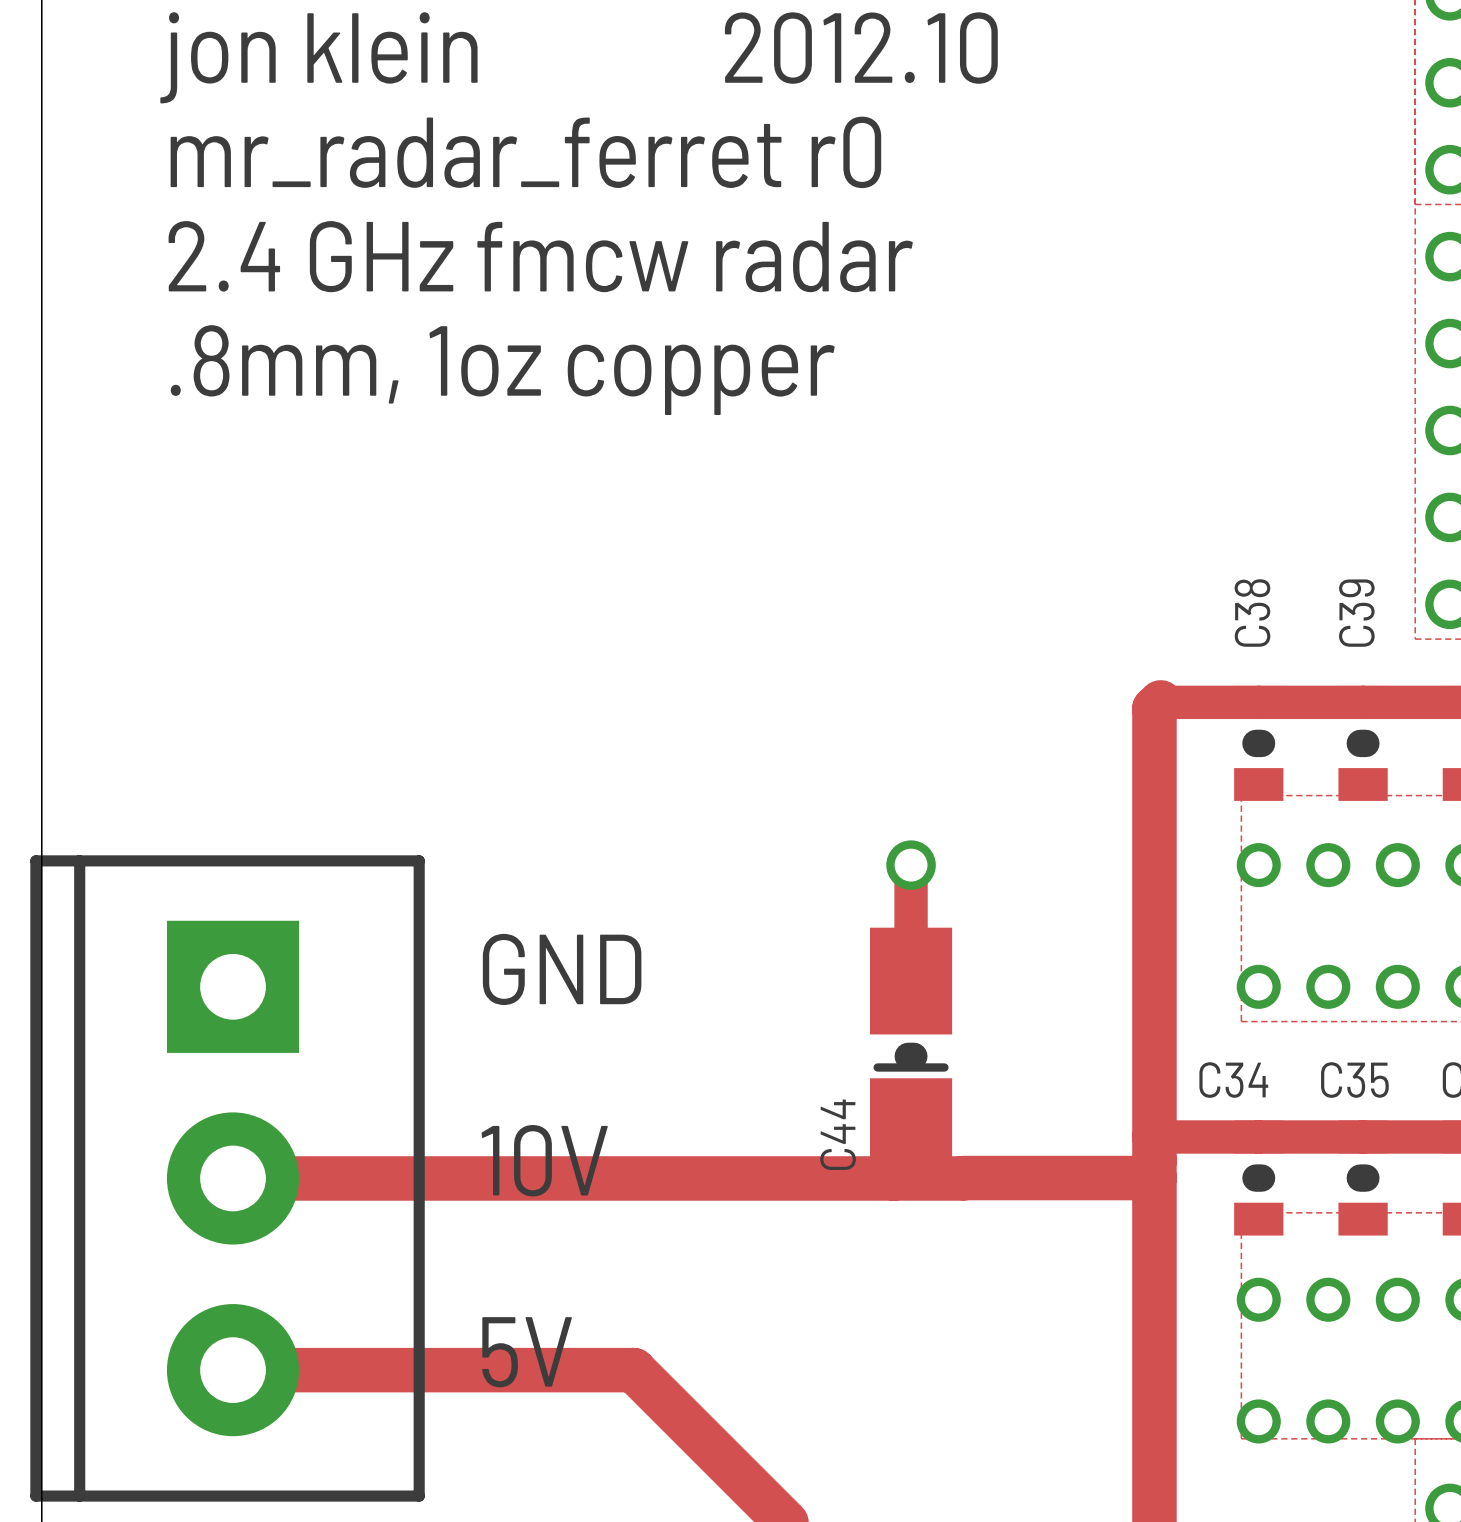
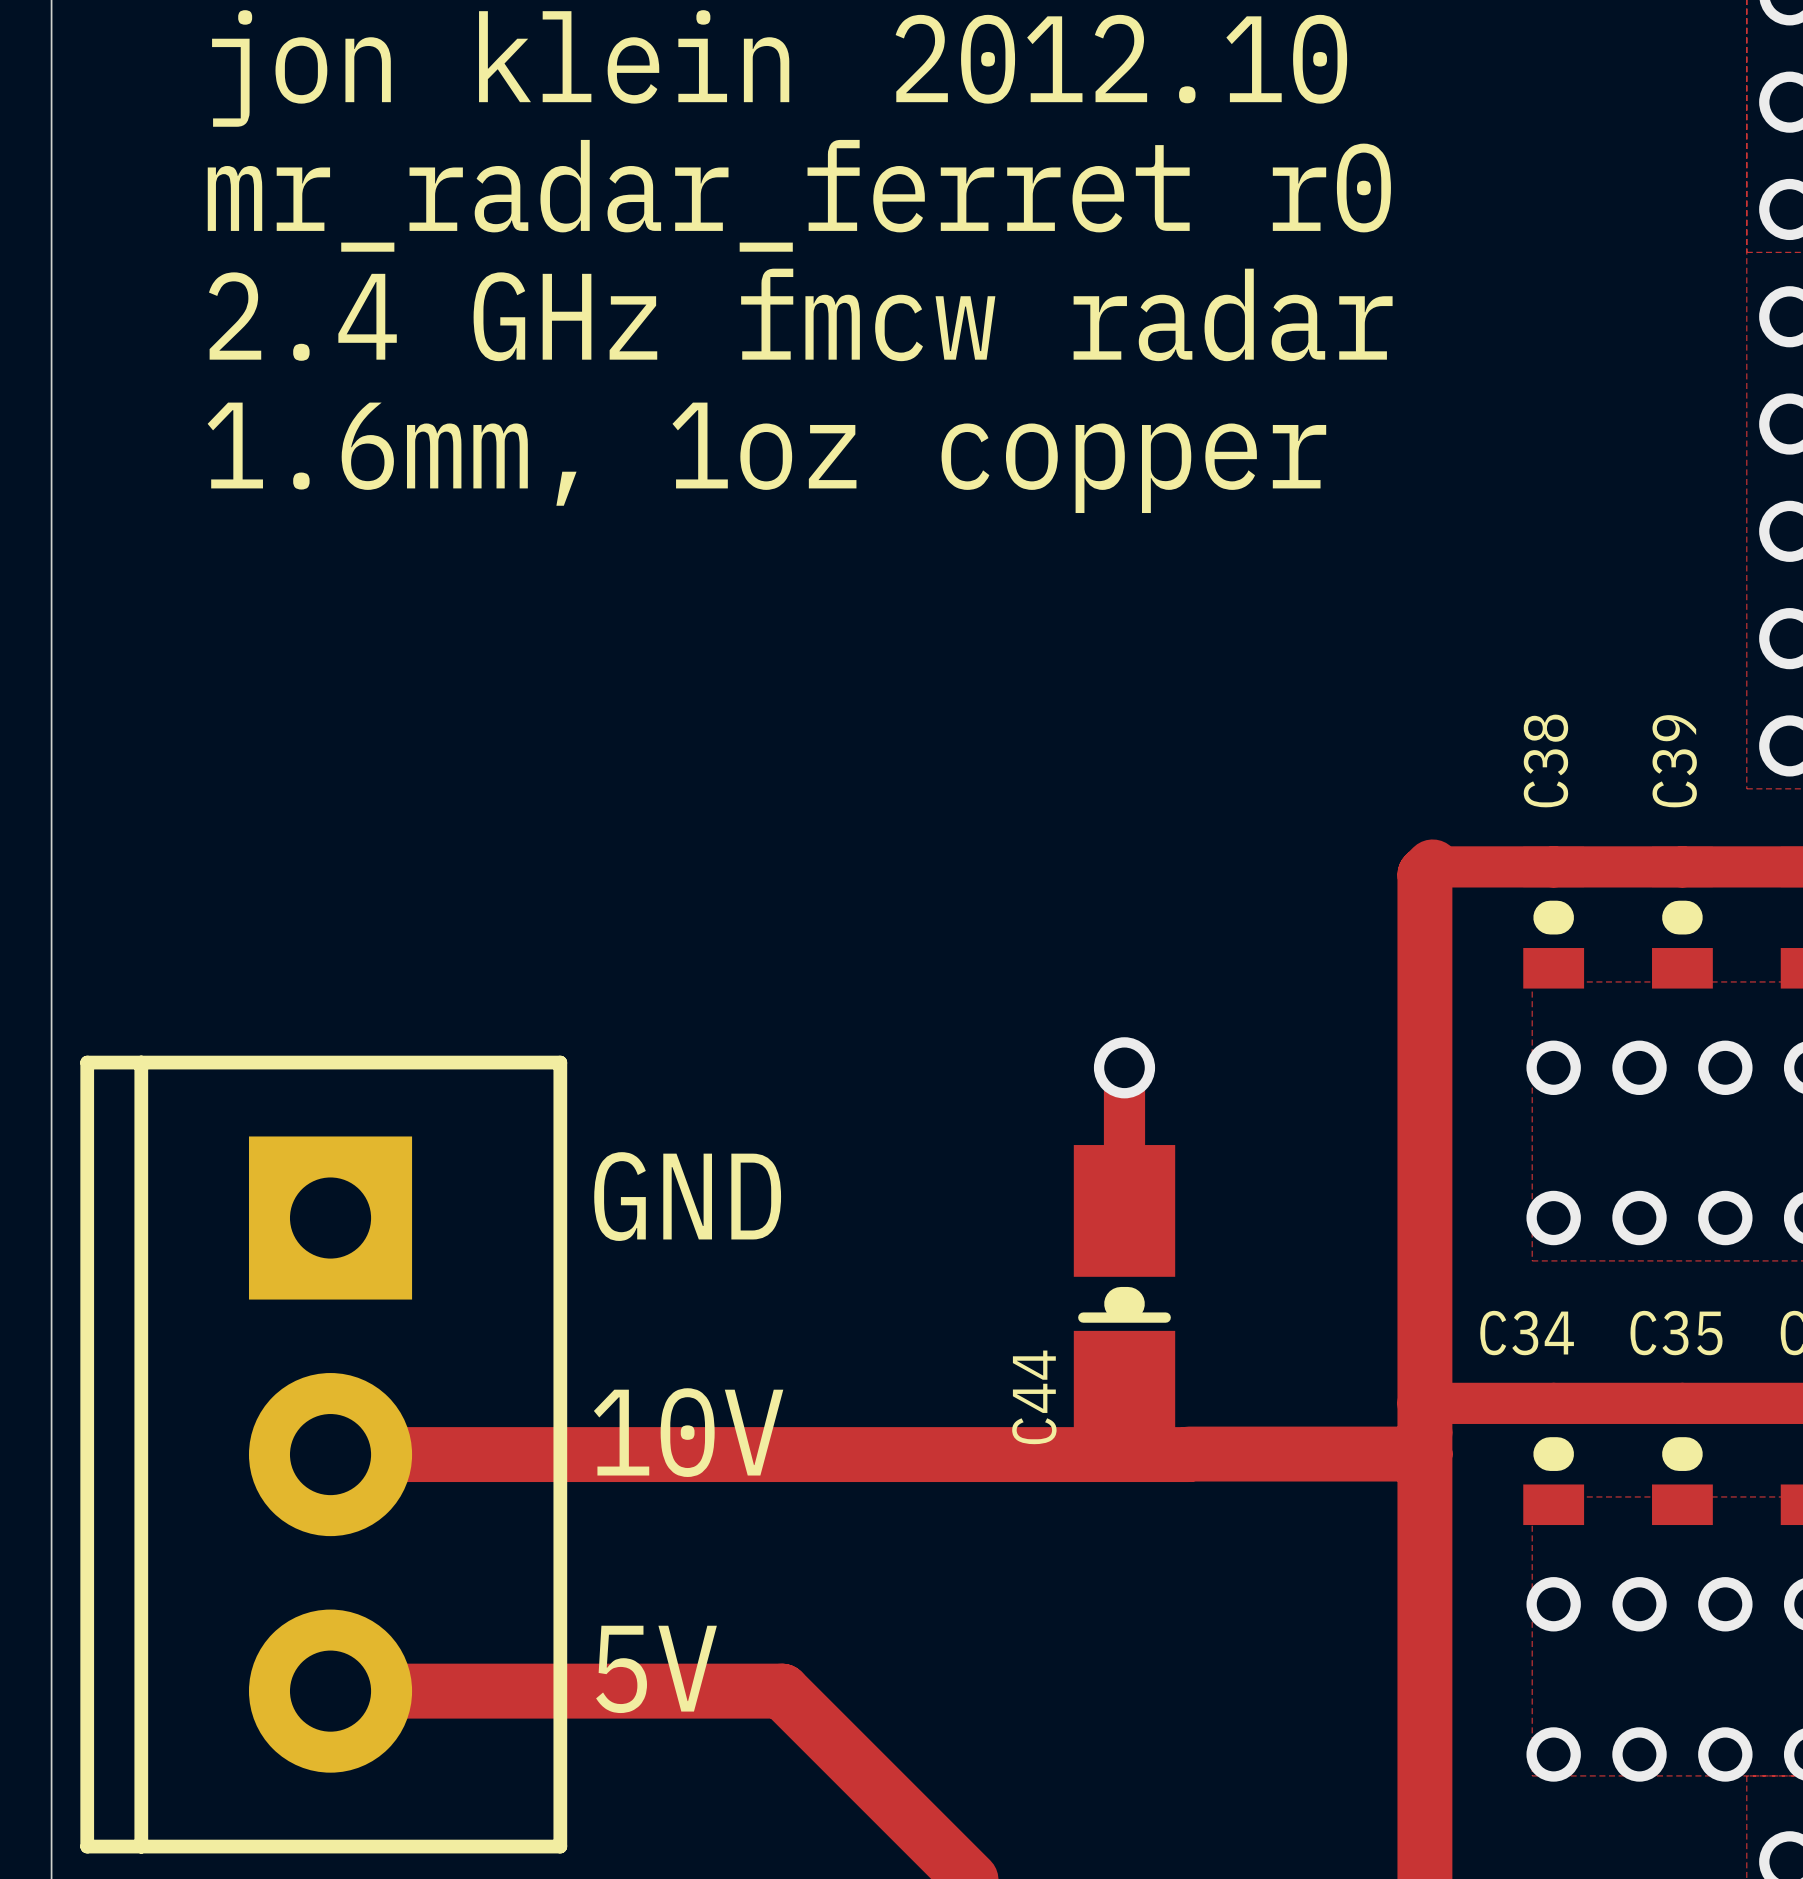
text: .8mm, 1oz copper (502, 370) -> 1.6mm, 1oz copper (766, 457)
part position: (227, 1178) -> (323, 1454)

